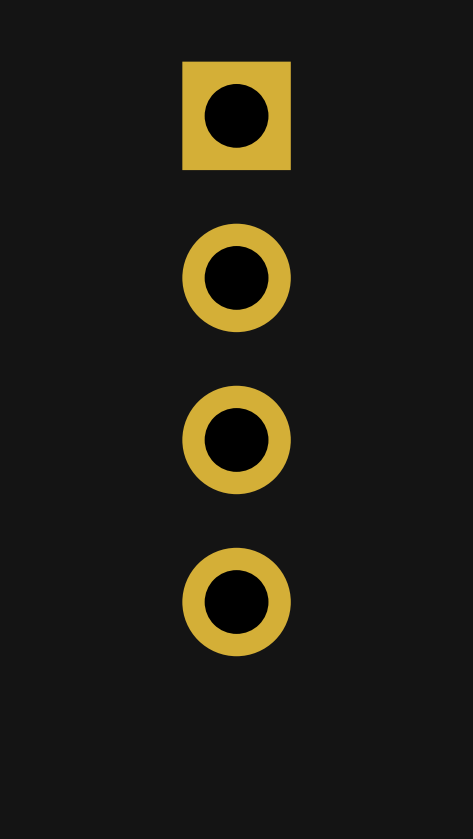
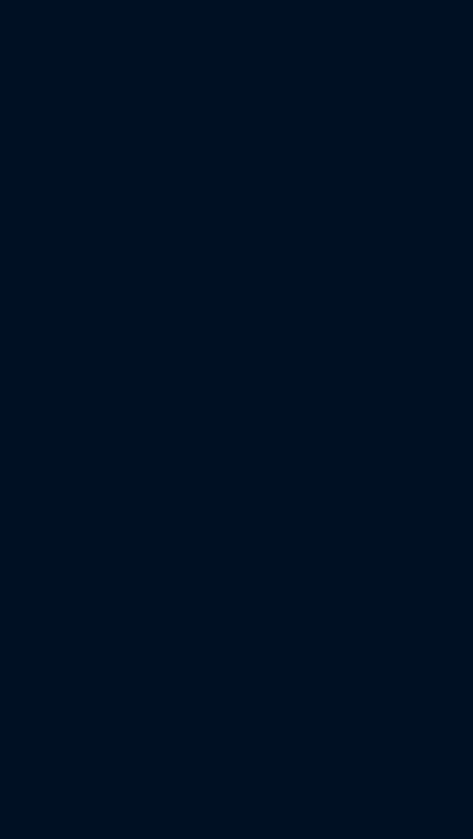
part: (236, 358) -> none

